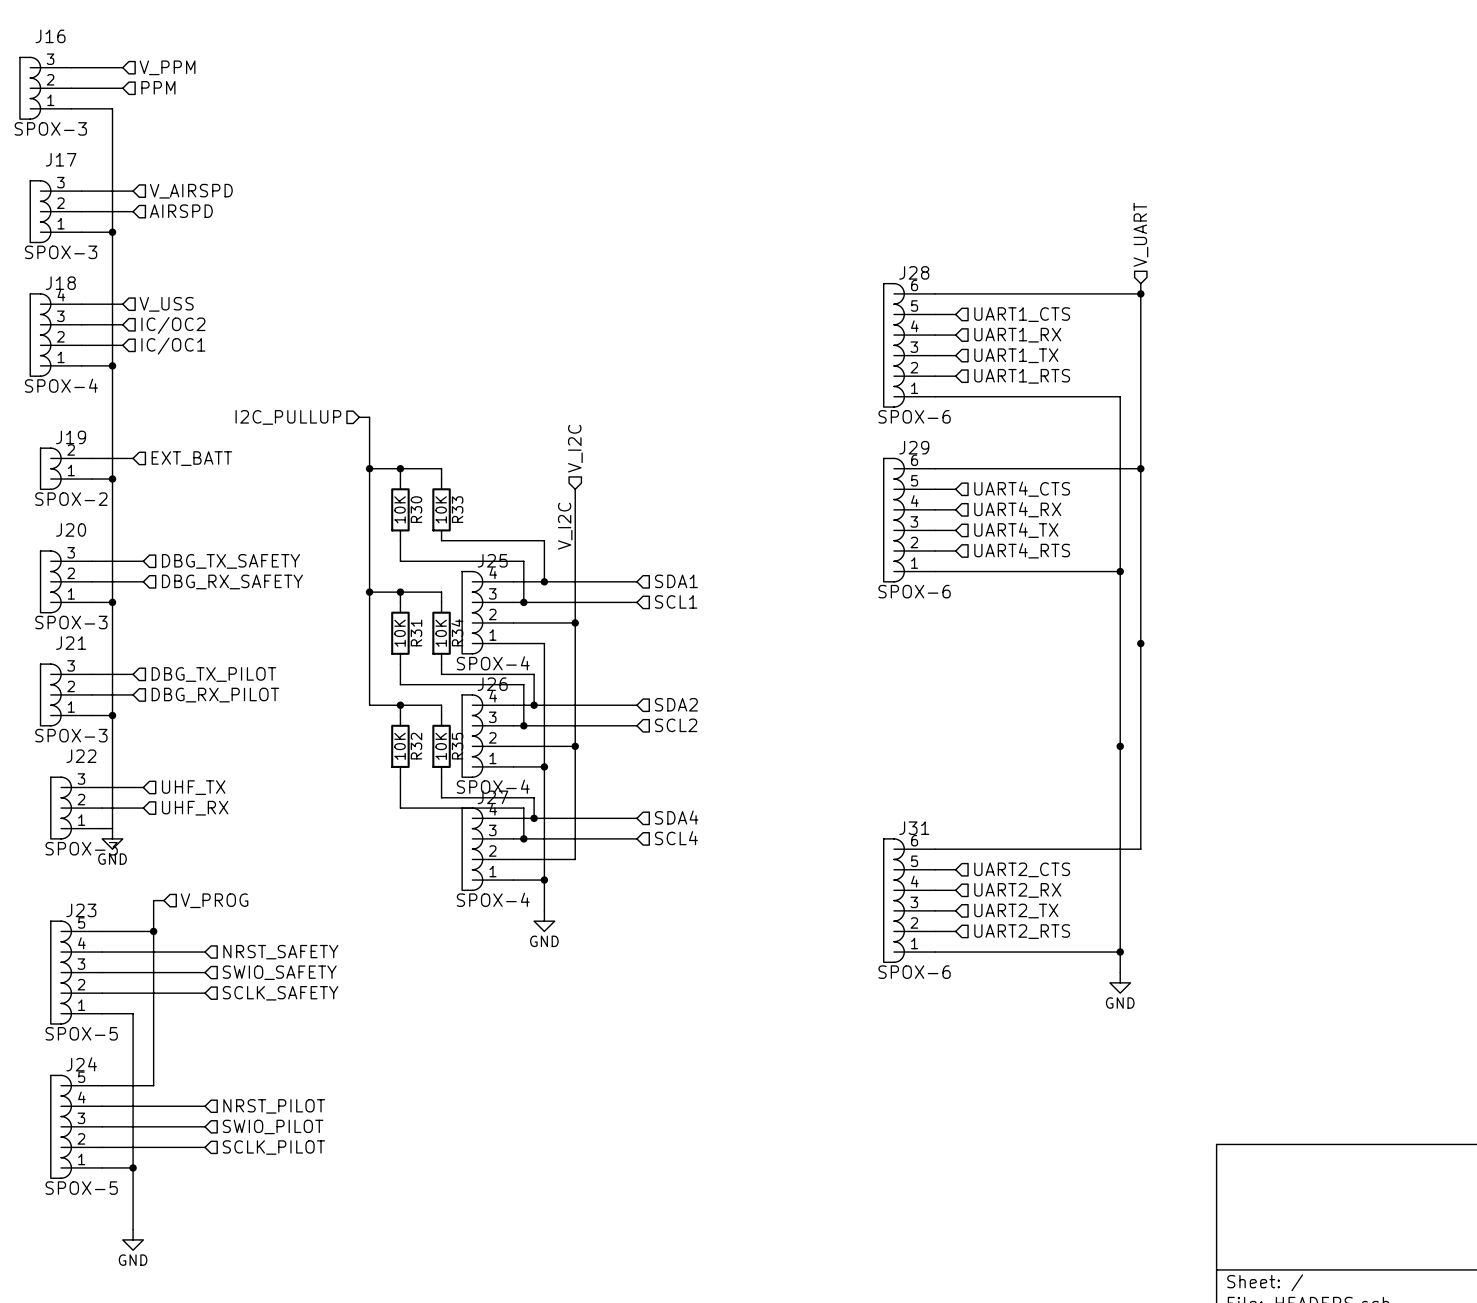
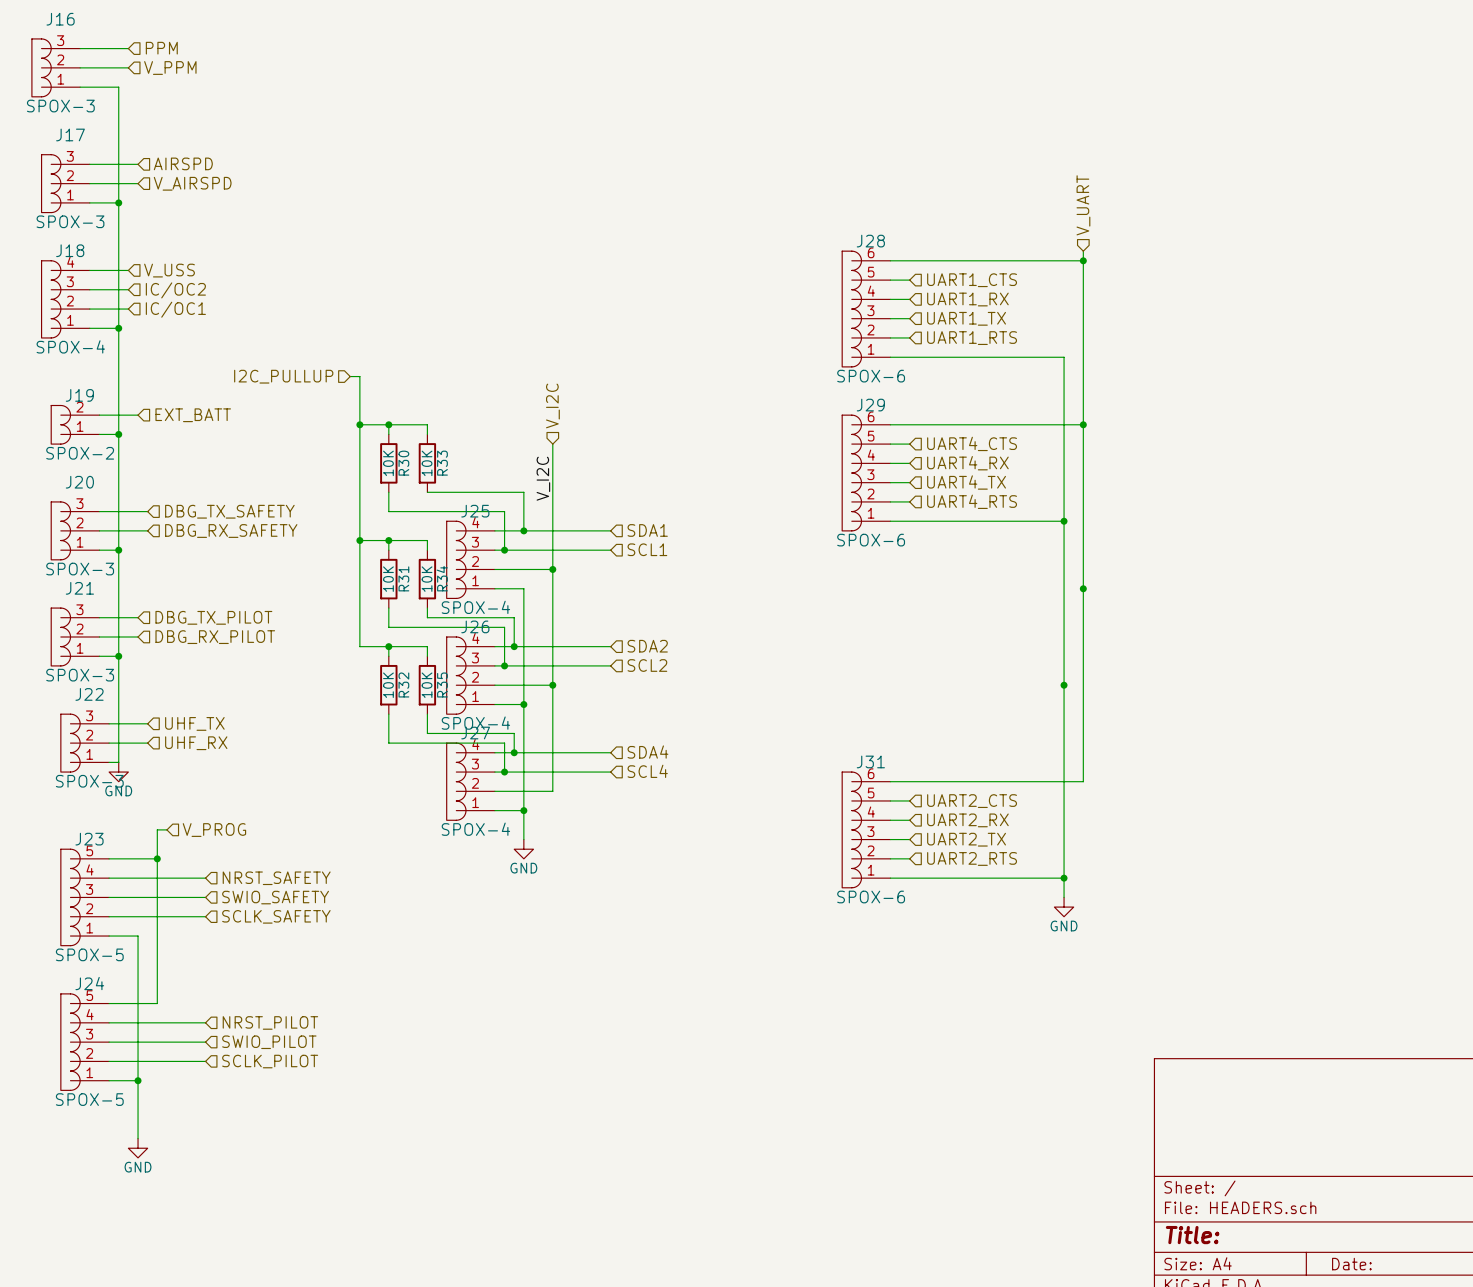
hierarchical label: V_PPM (167, 67) -> PPM (161, 48)
hierarchical label: PPM (158, 87) -> V_PPM (170, 68)
hierarchical label: V_AIRSPD (191, 191) -> AIRSPD (183, 163)
hierarchical label: AIRSPD (181, 211) -> V_AIRSPD (192, 183)

